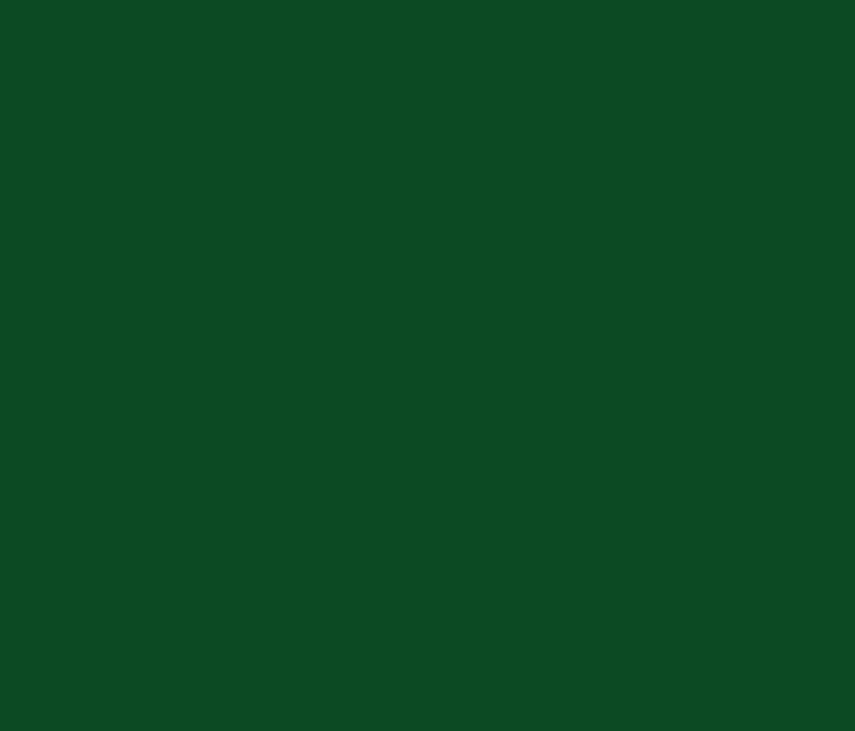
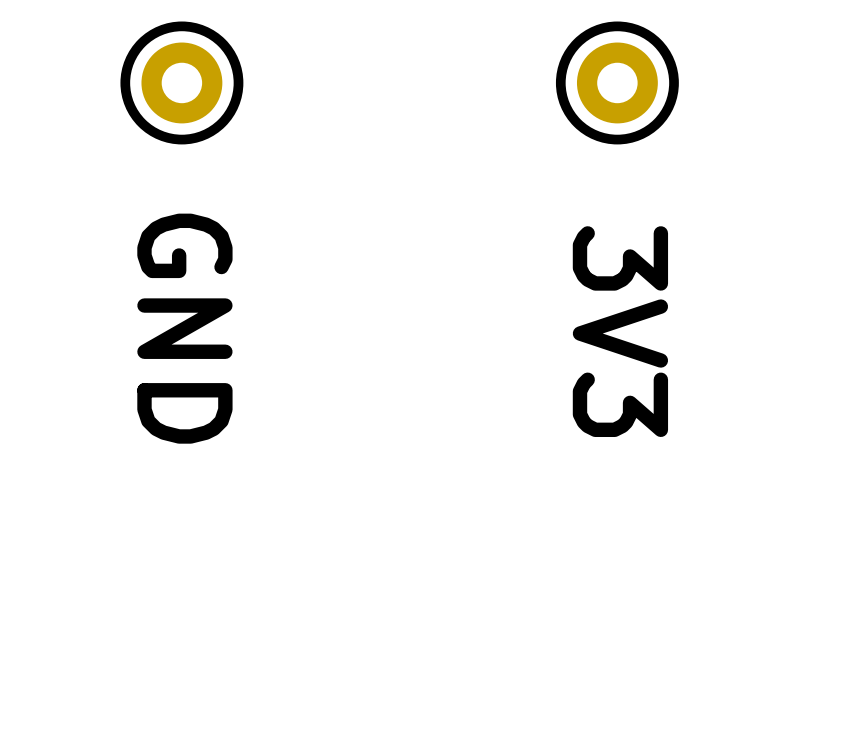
part: none -> (181, 82)
part: none -> (617, 82)
text: none -> GND (184, 328)
text: none -> 3V3 (620, 331)

